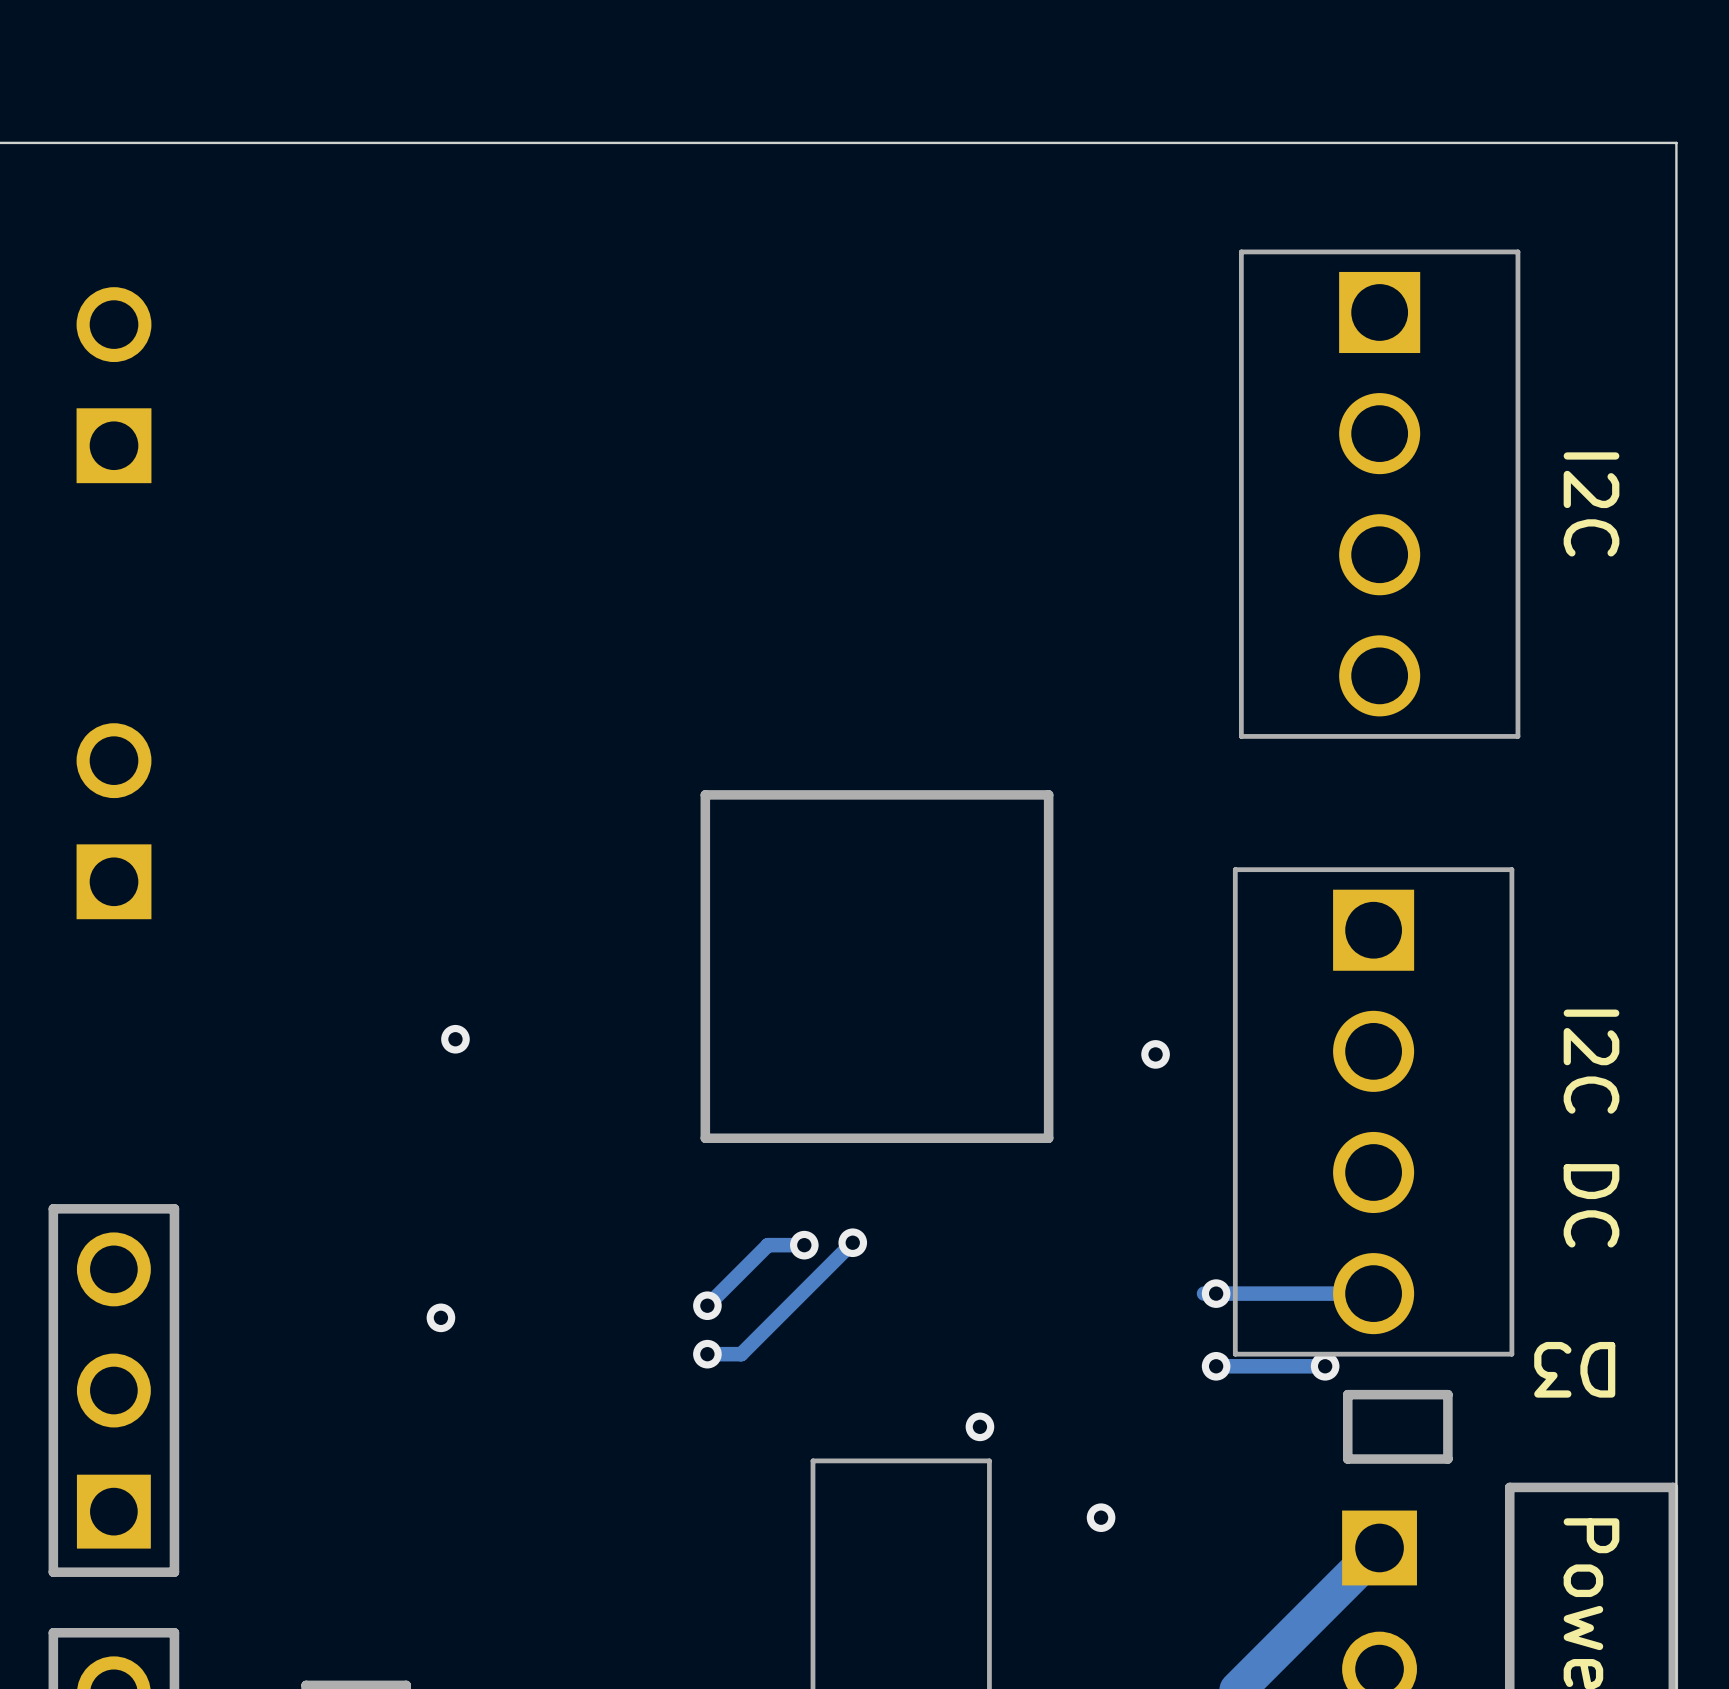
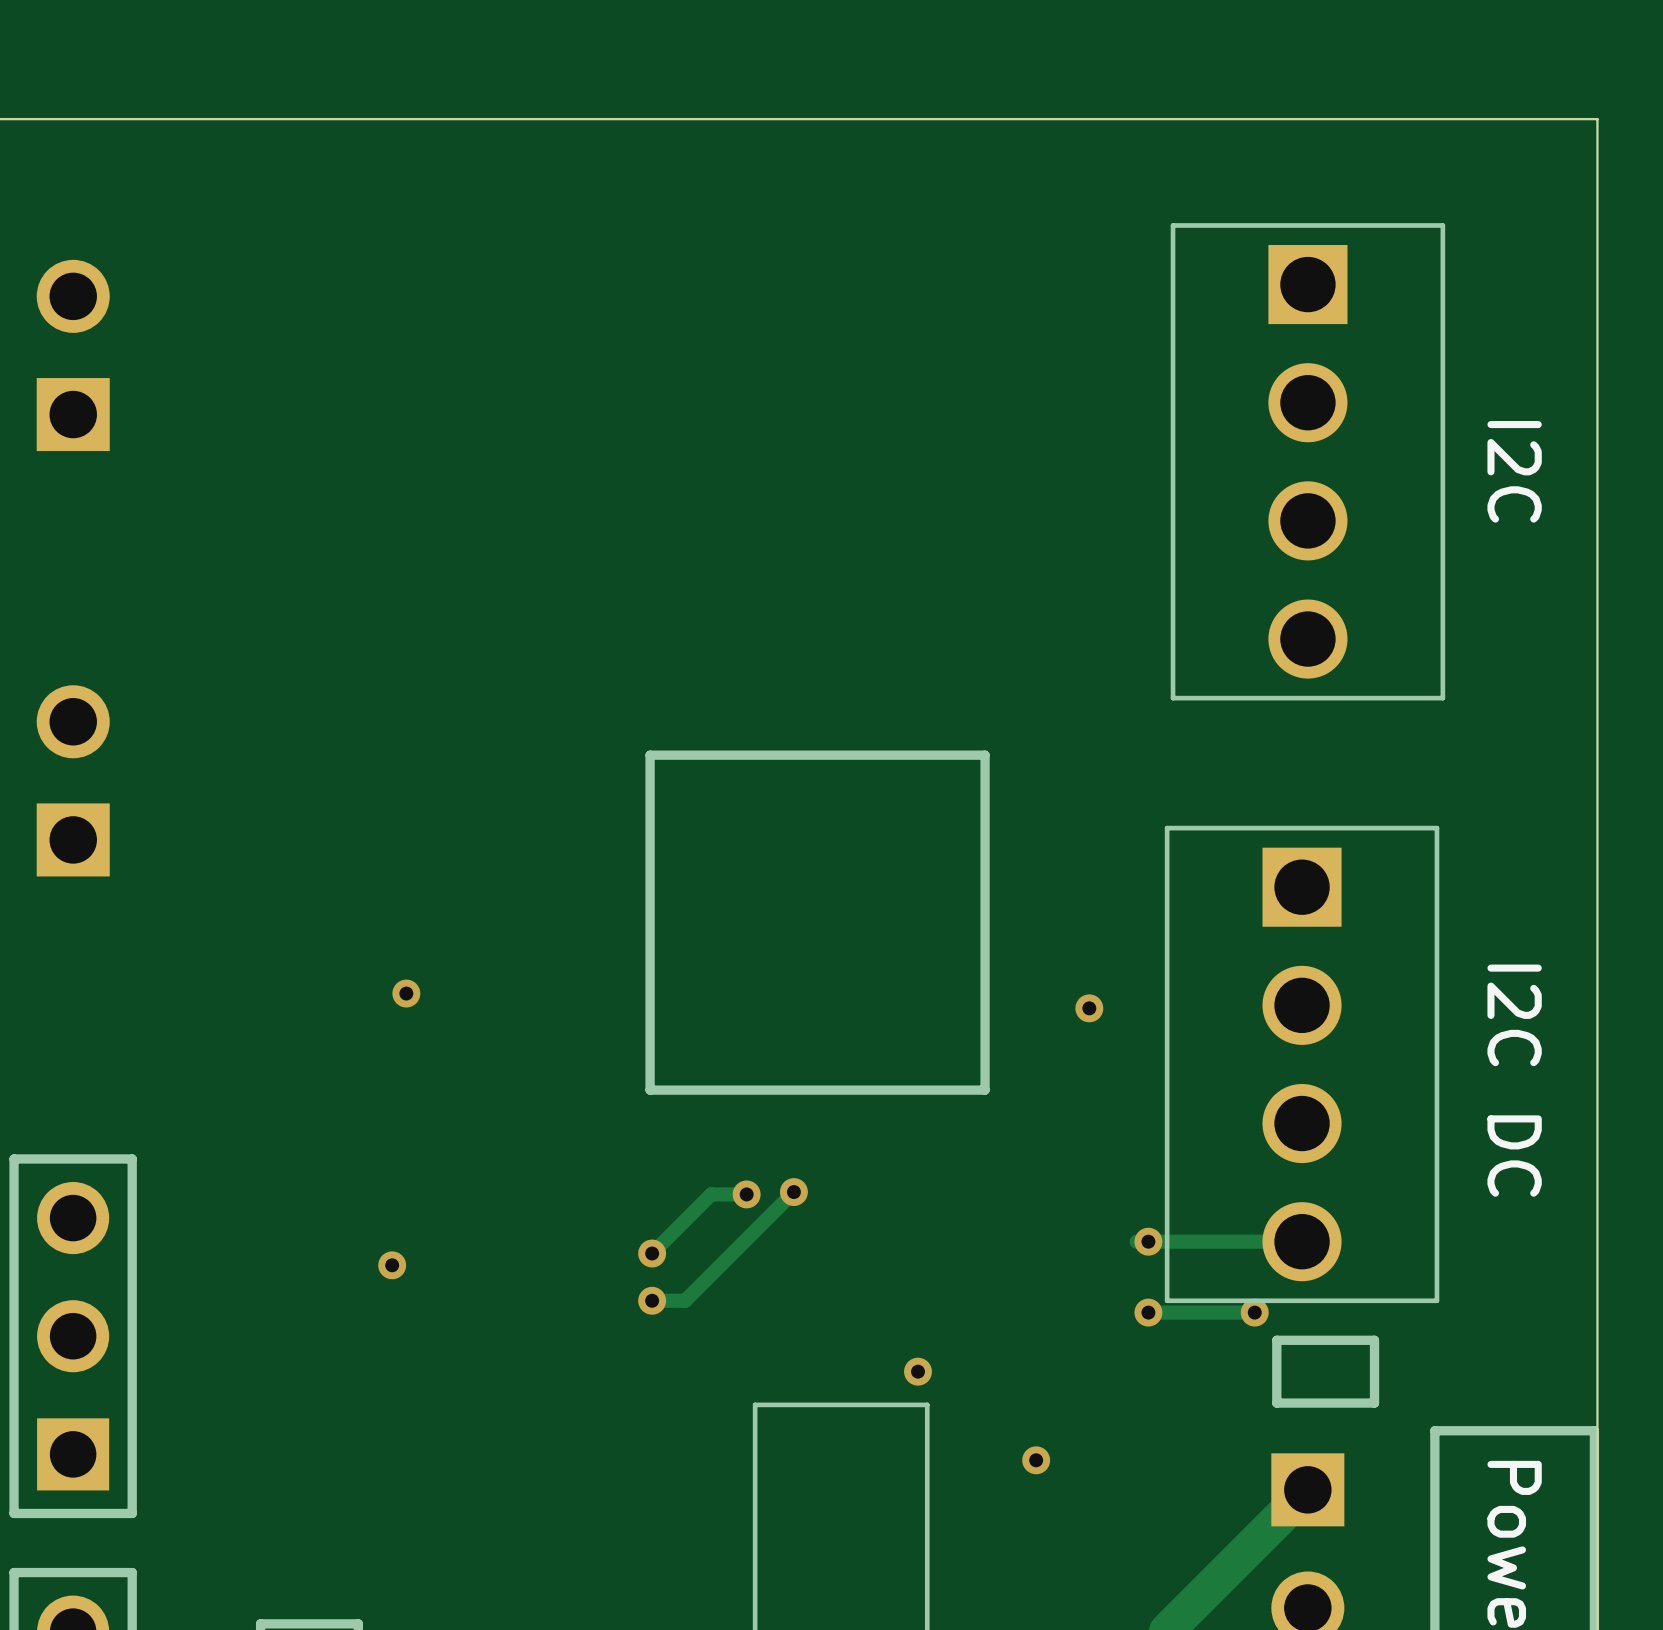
D3 name: D3 (1574, 1369) -> none

